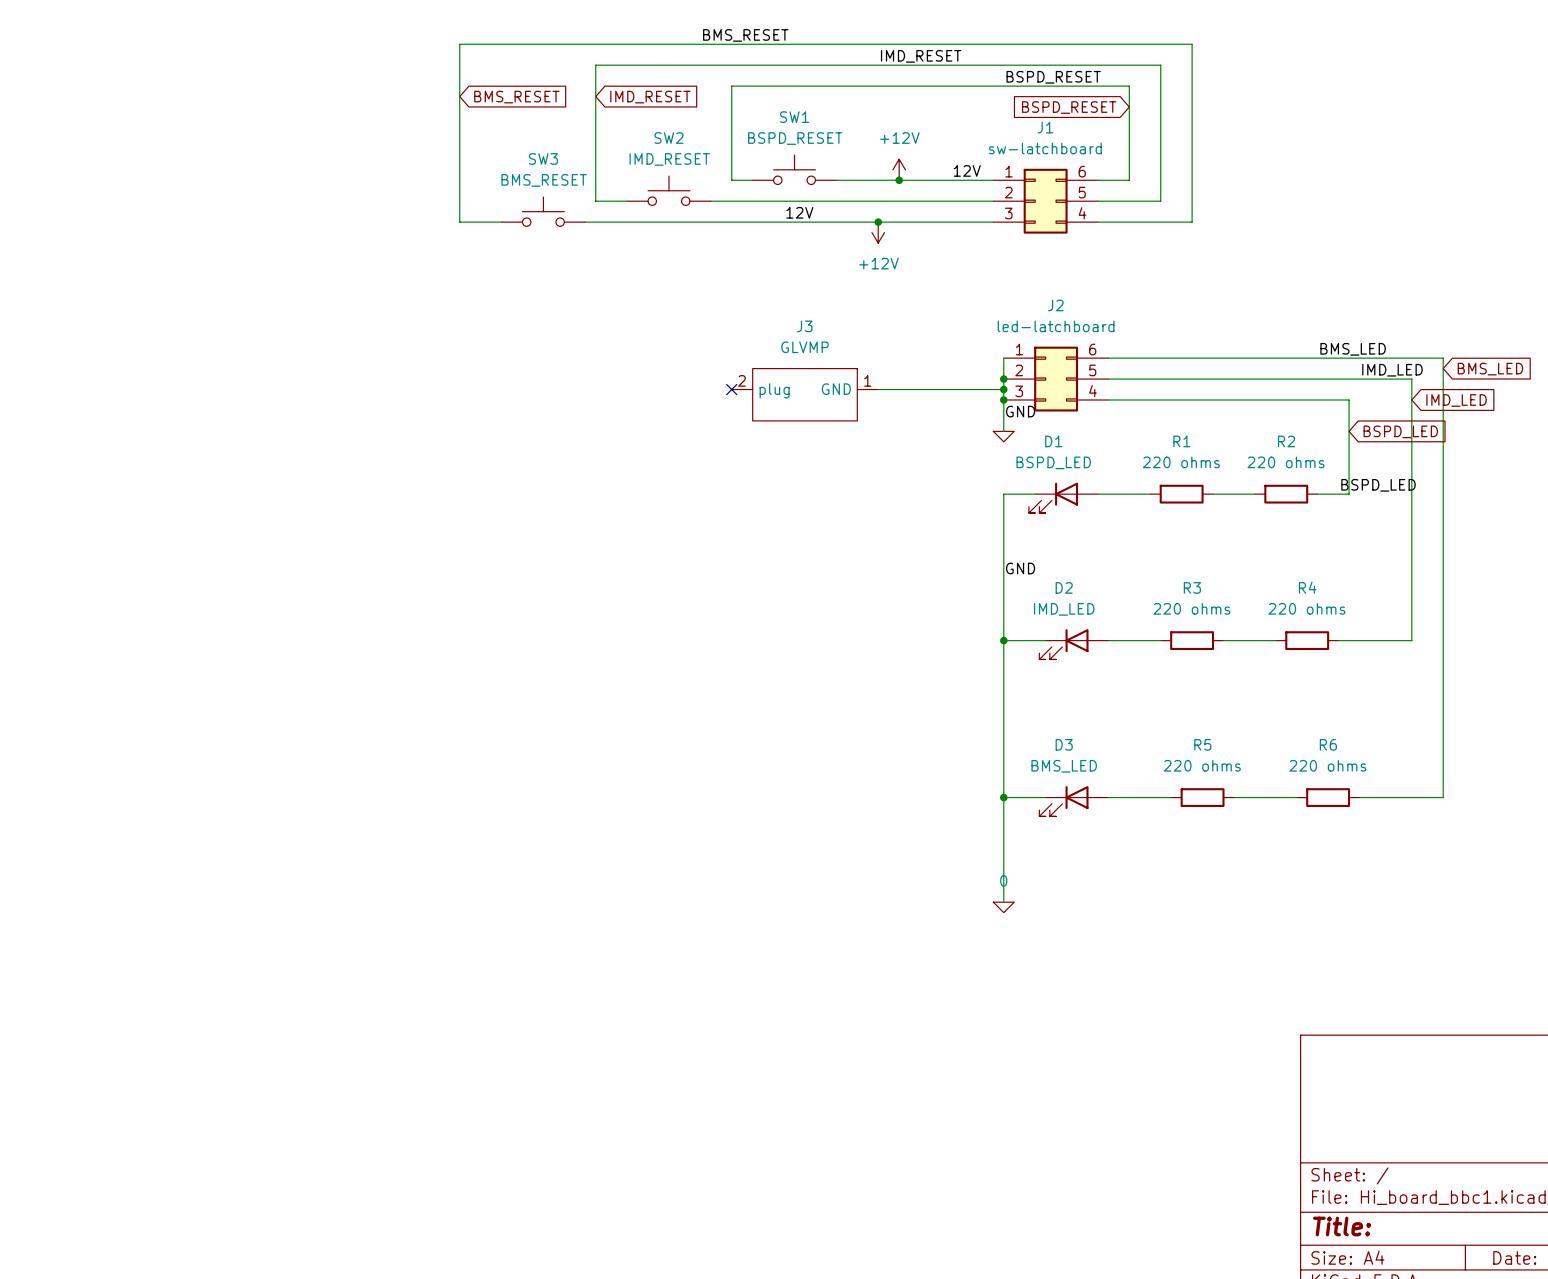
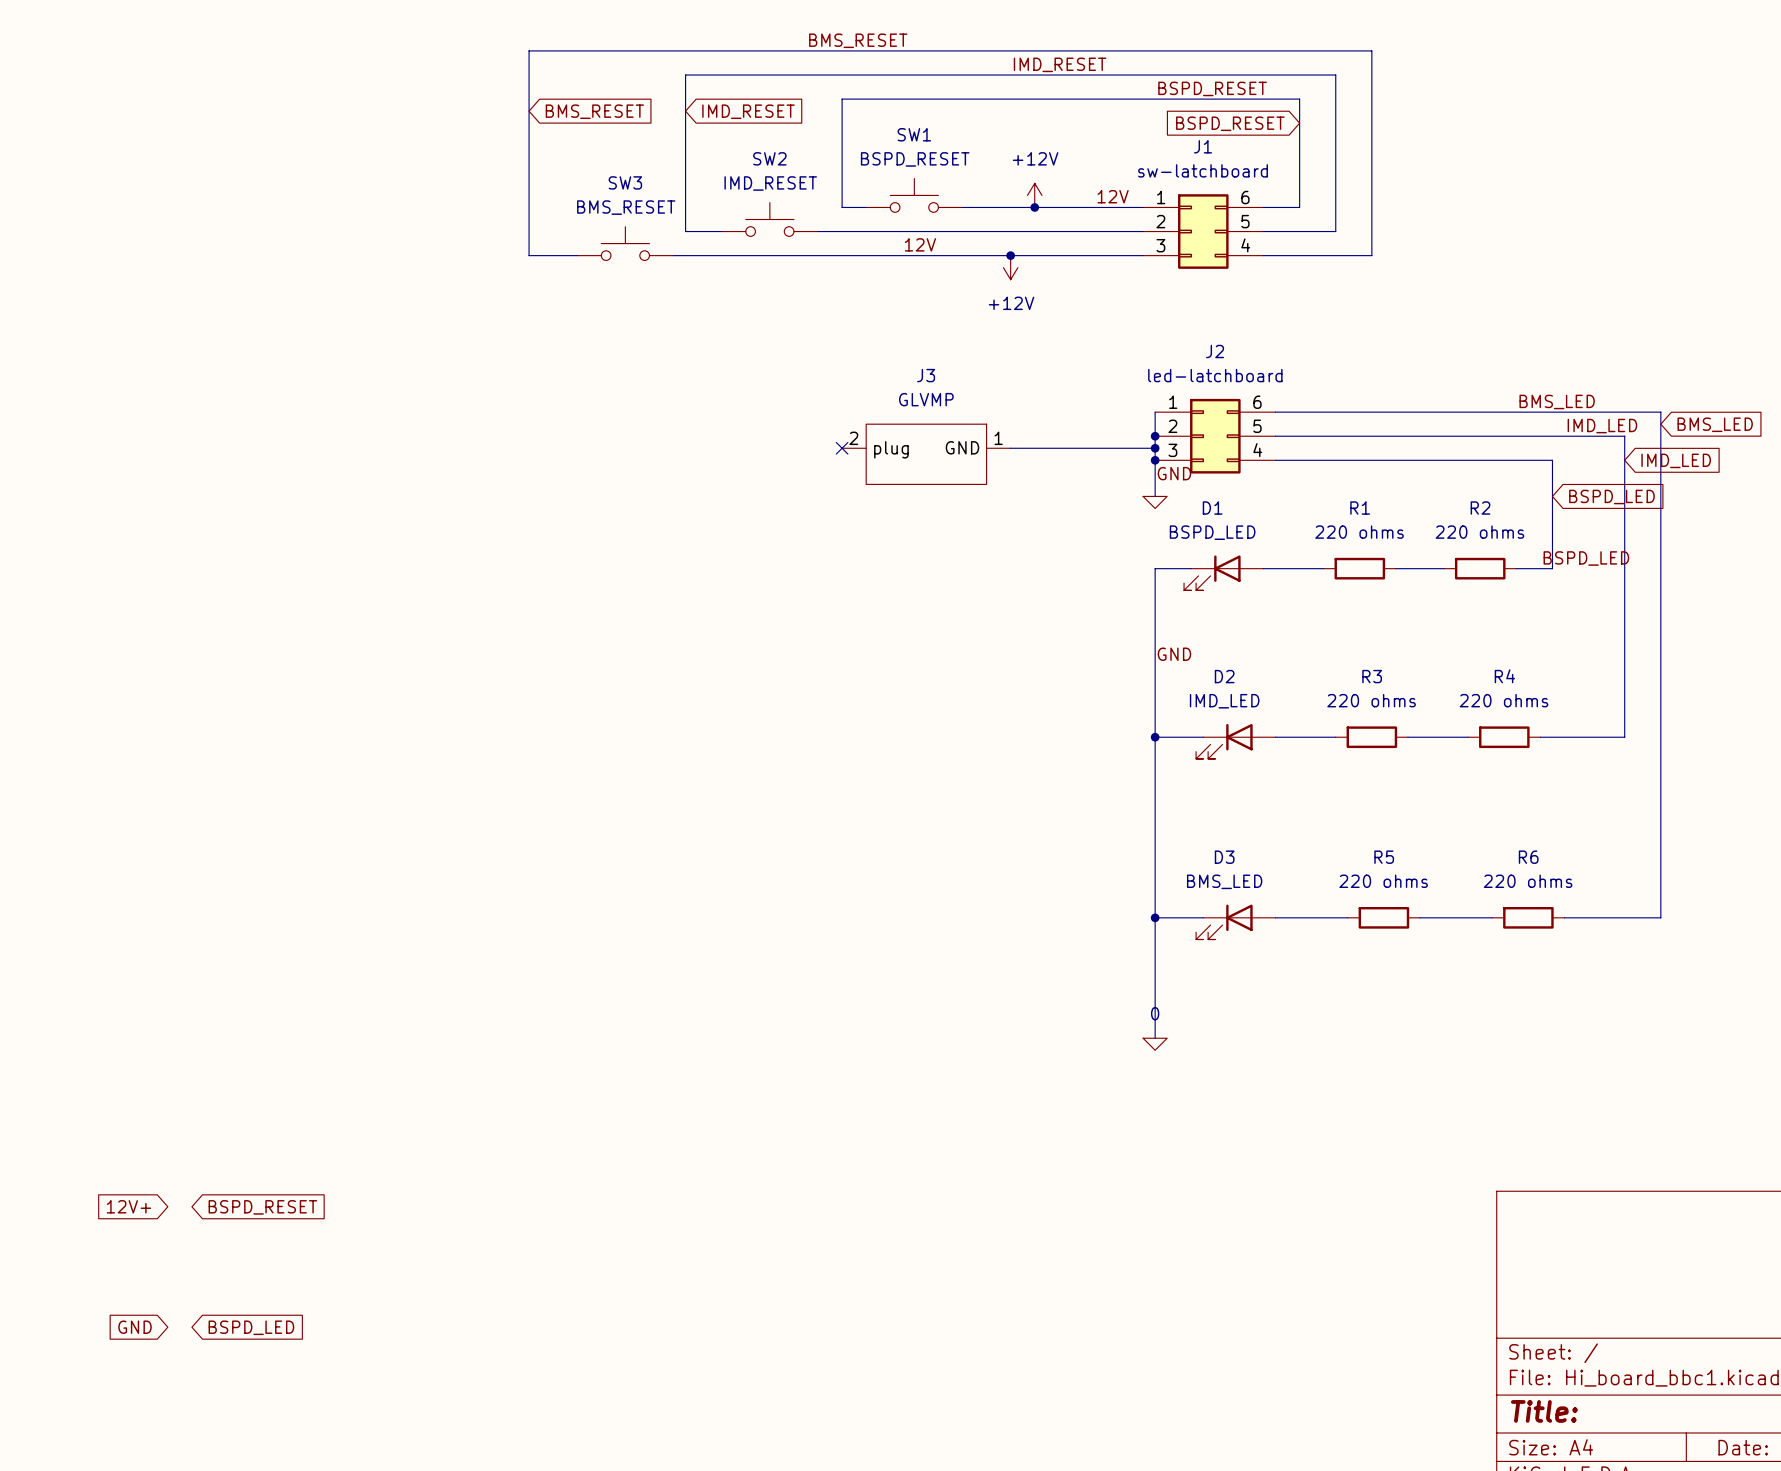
global label: none -> 12V+ (128, 1206)
global label: none -> BSPD_RESET (262, 1207)
global label: none -> GND (135, 1327)
global label: none -> BSPD_LED (251, 1327)

